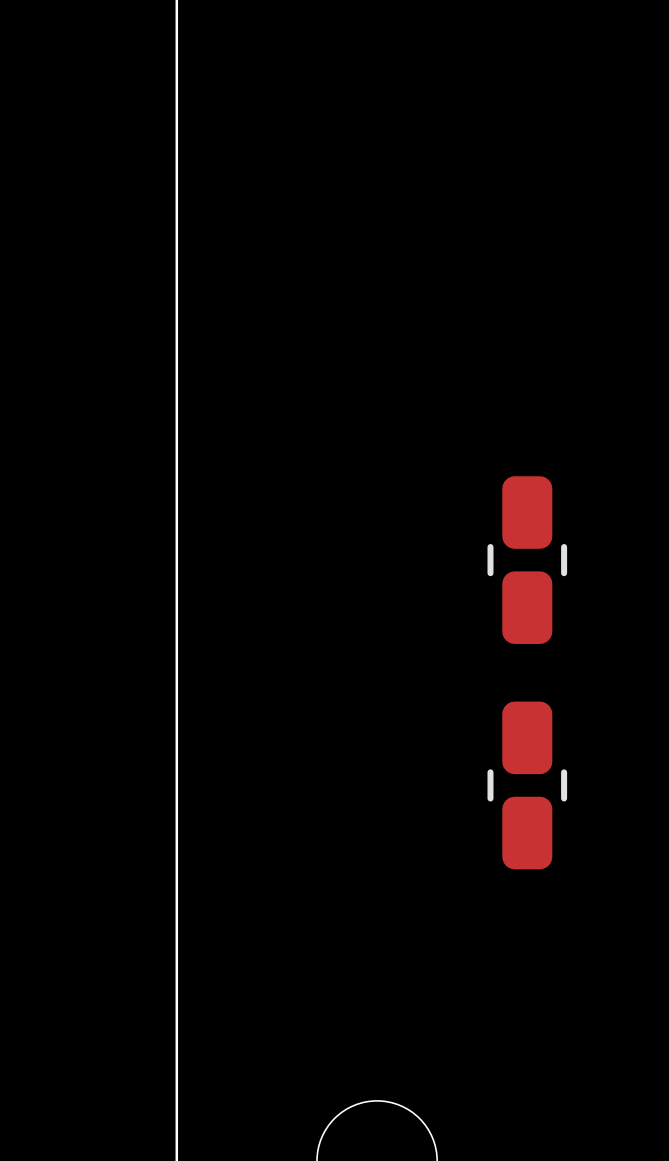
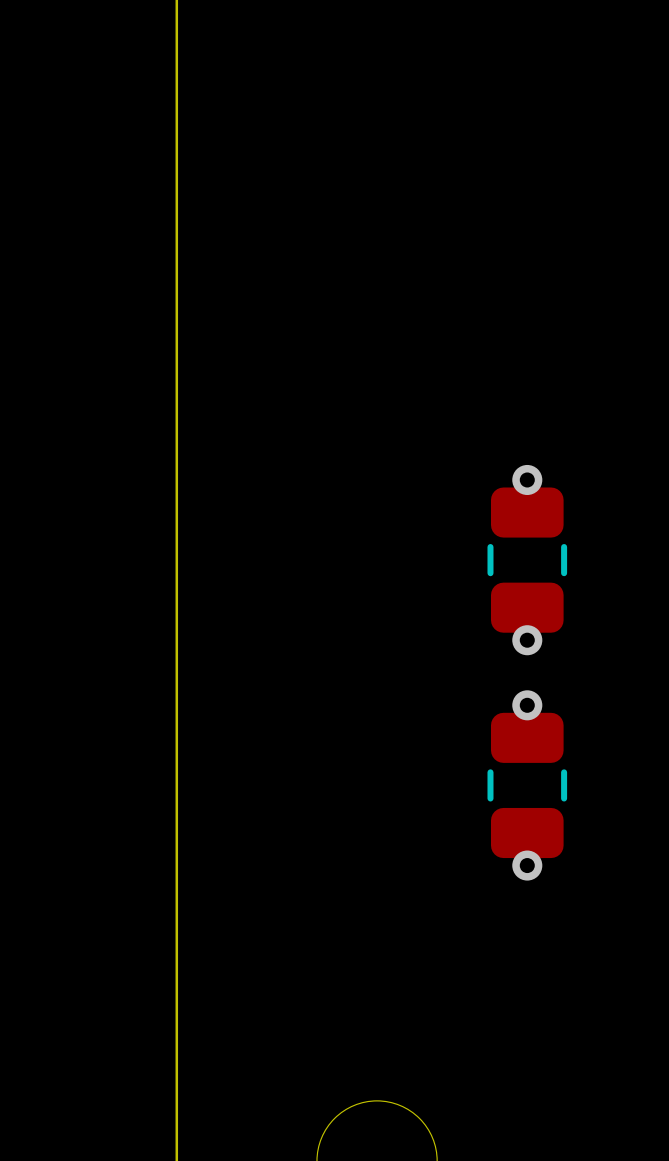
part footprint: [487, 476, 568, 644] -> [487, 487, 568, 633]
via: none -> (527, 479)
via: none -> (527, 640)
part footprint: [487, 701, 568, 870] -> [487, 712, 568, 859]
via: none -> (527, 705)
via: none -> (527, 865)

